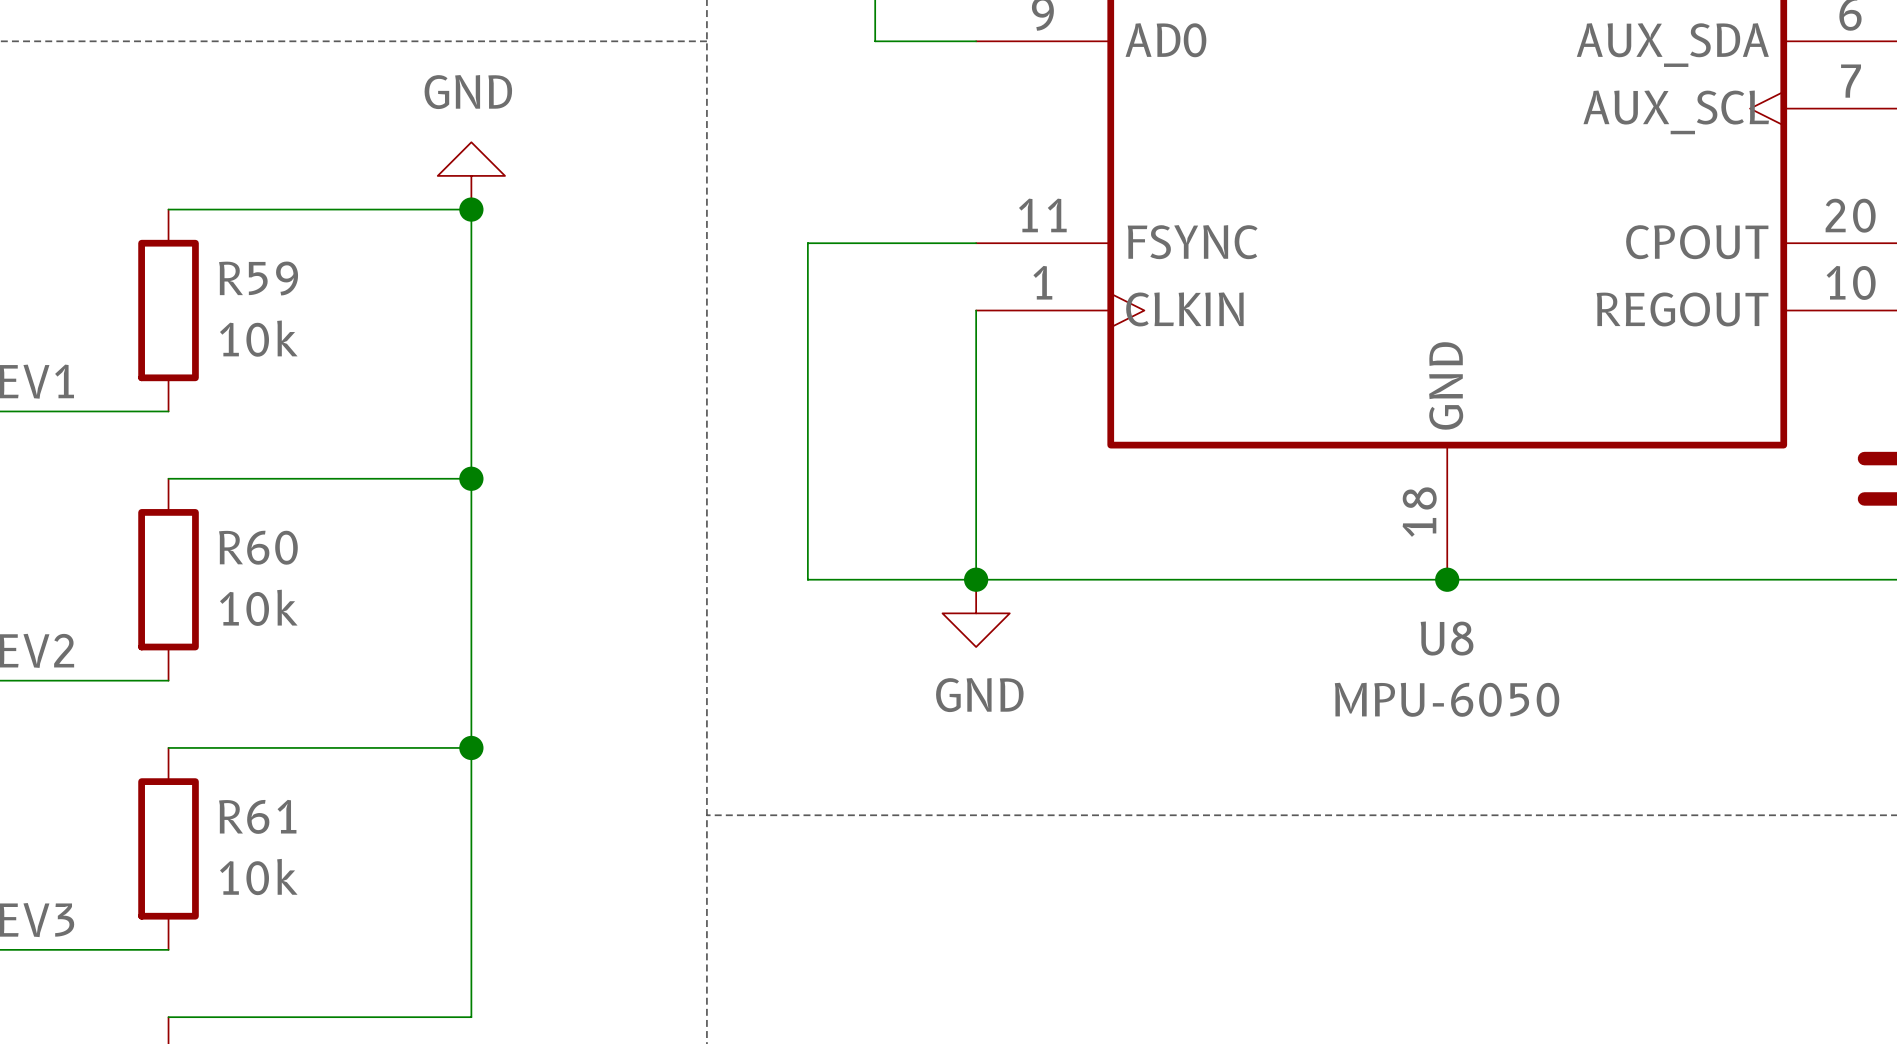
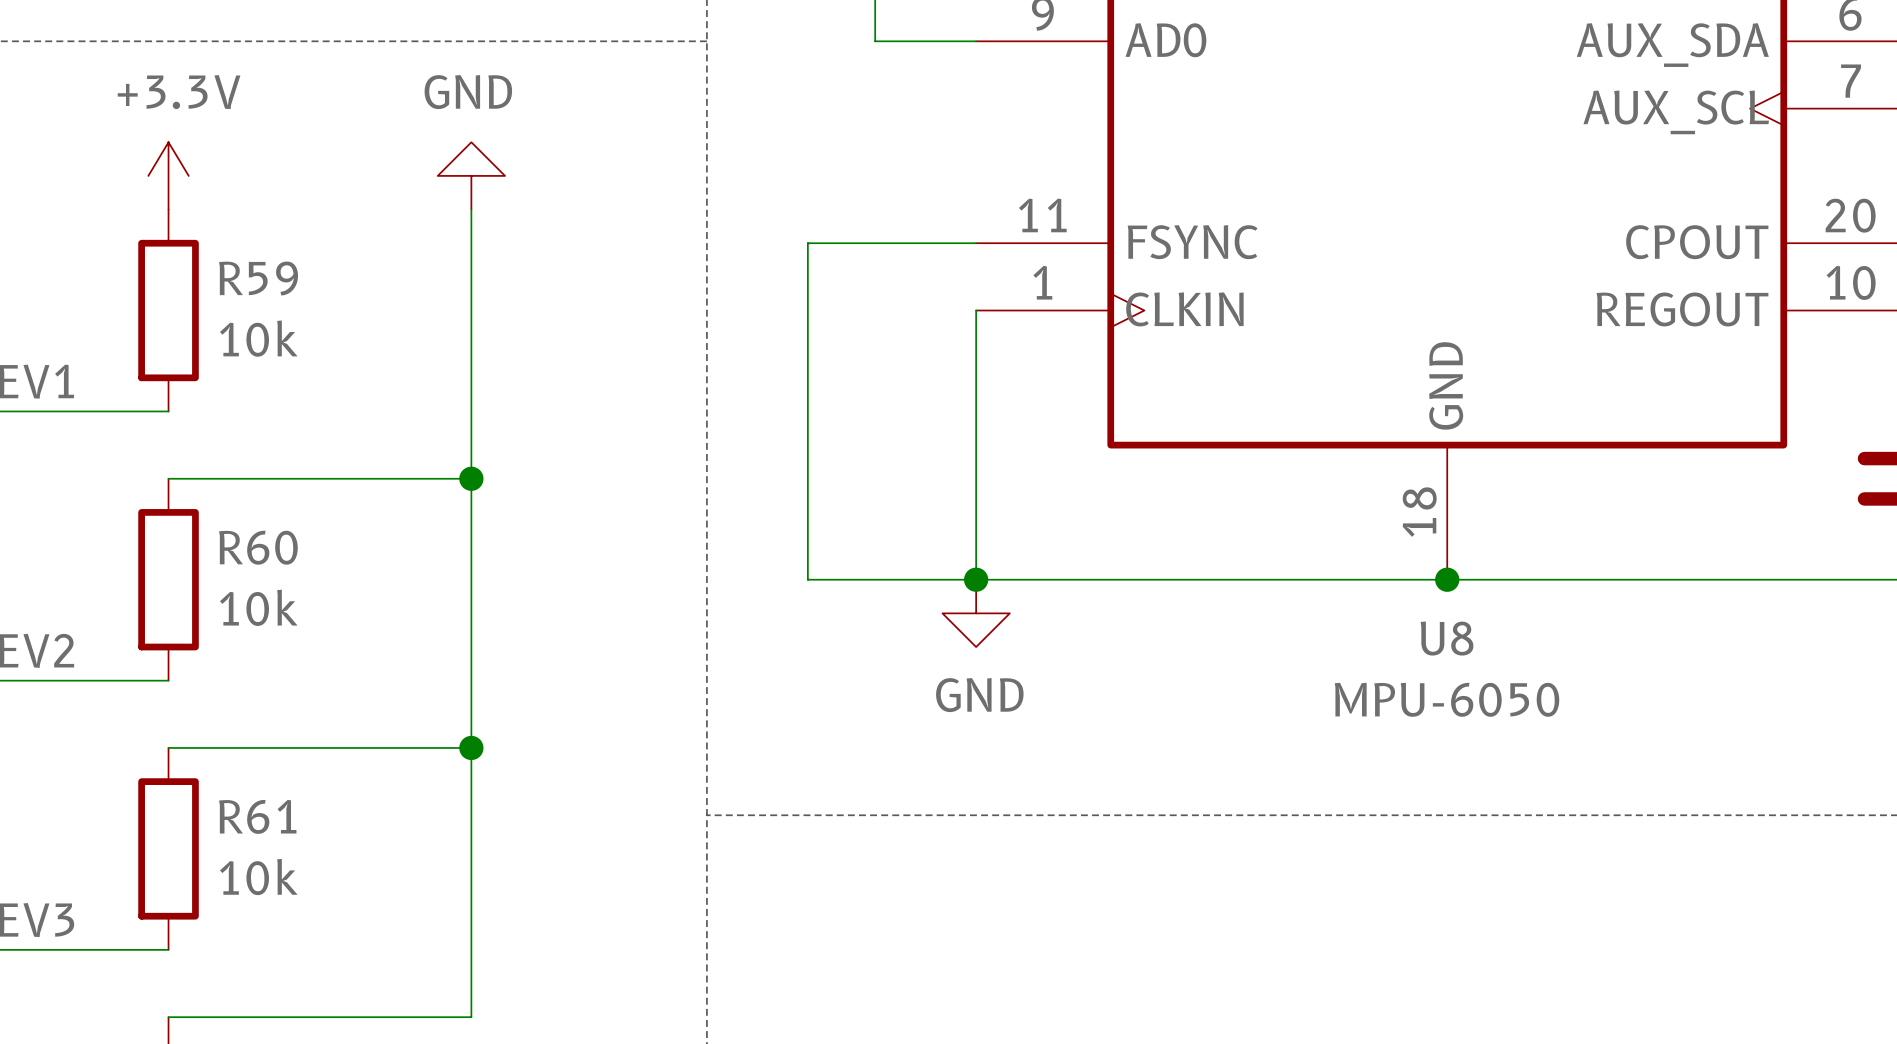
power symbol: none -> +3.3V (168, 175)
wire: (168, 209) (471, 209) -> none
junction: (471, 209) -> none

